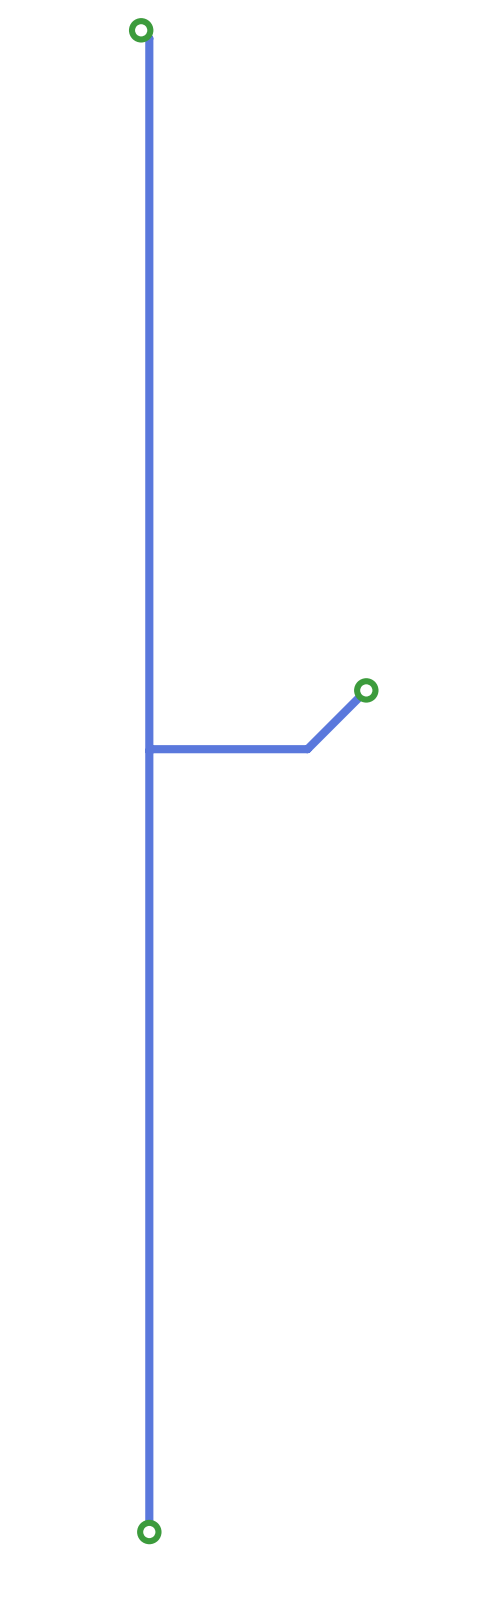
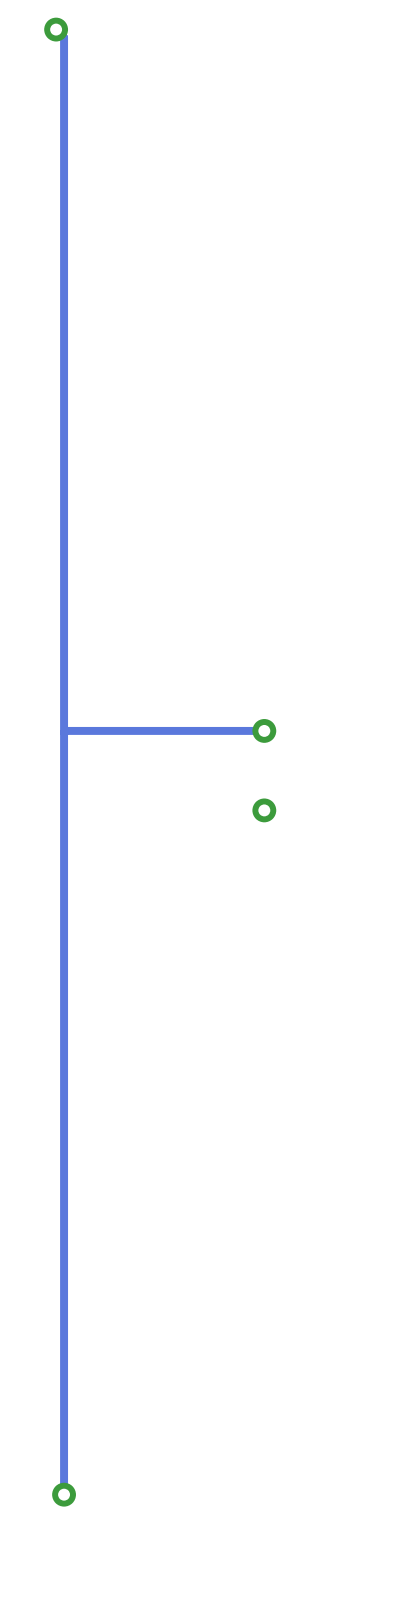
track: (366, 690) (307, 749) -> (264, 730) (218, 730)
via position: (366, 690) -> (264, 730)
via: none -> (264, 810)

